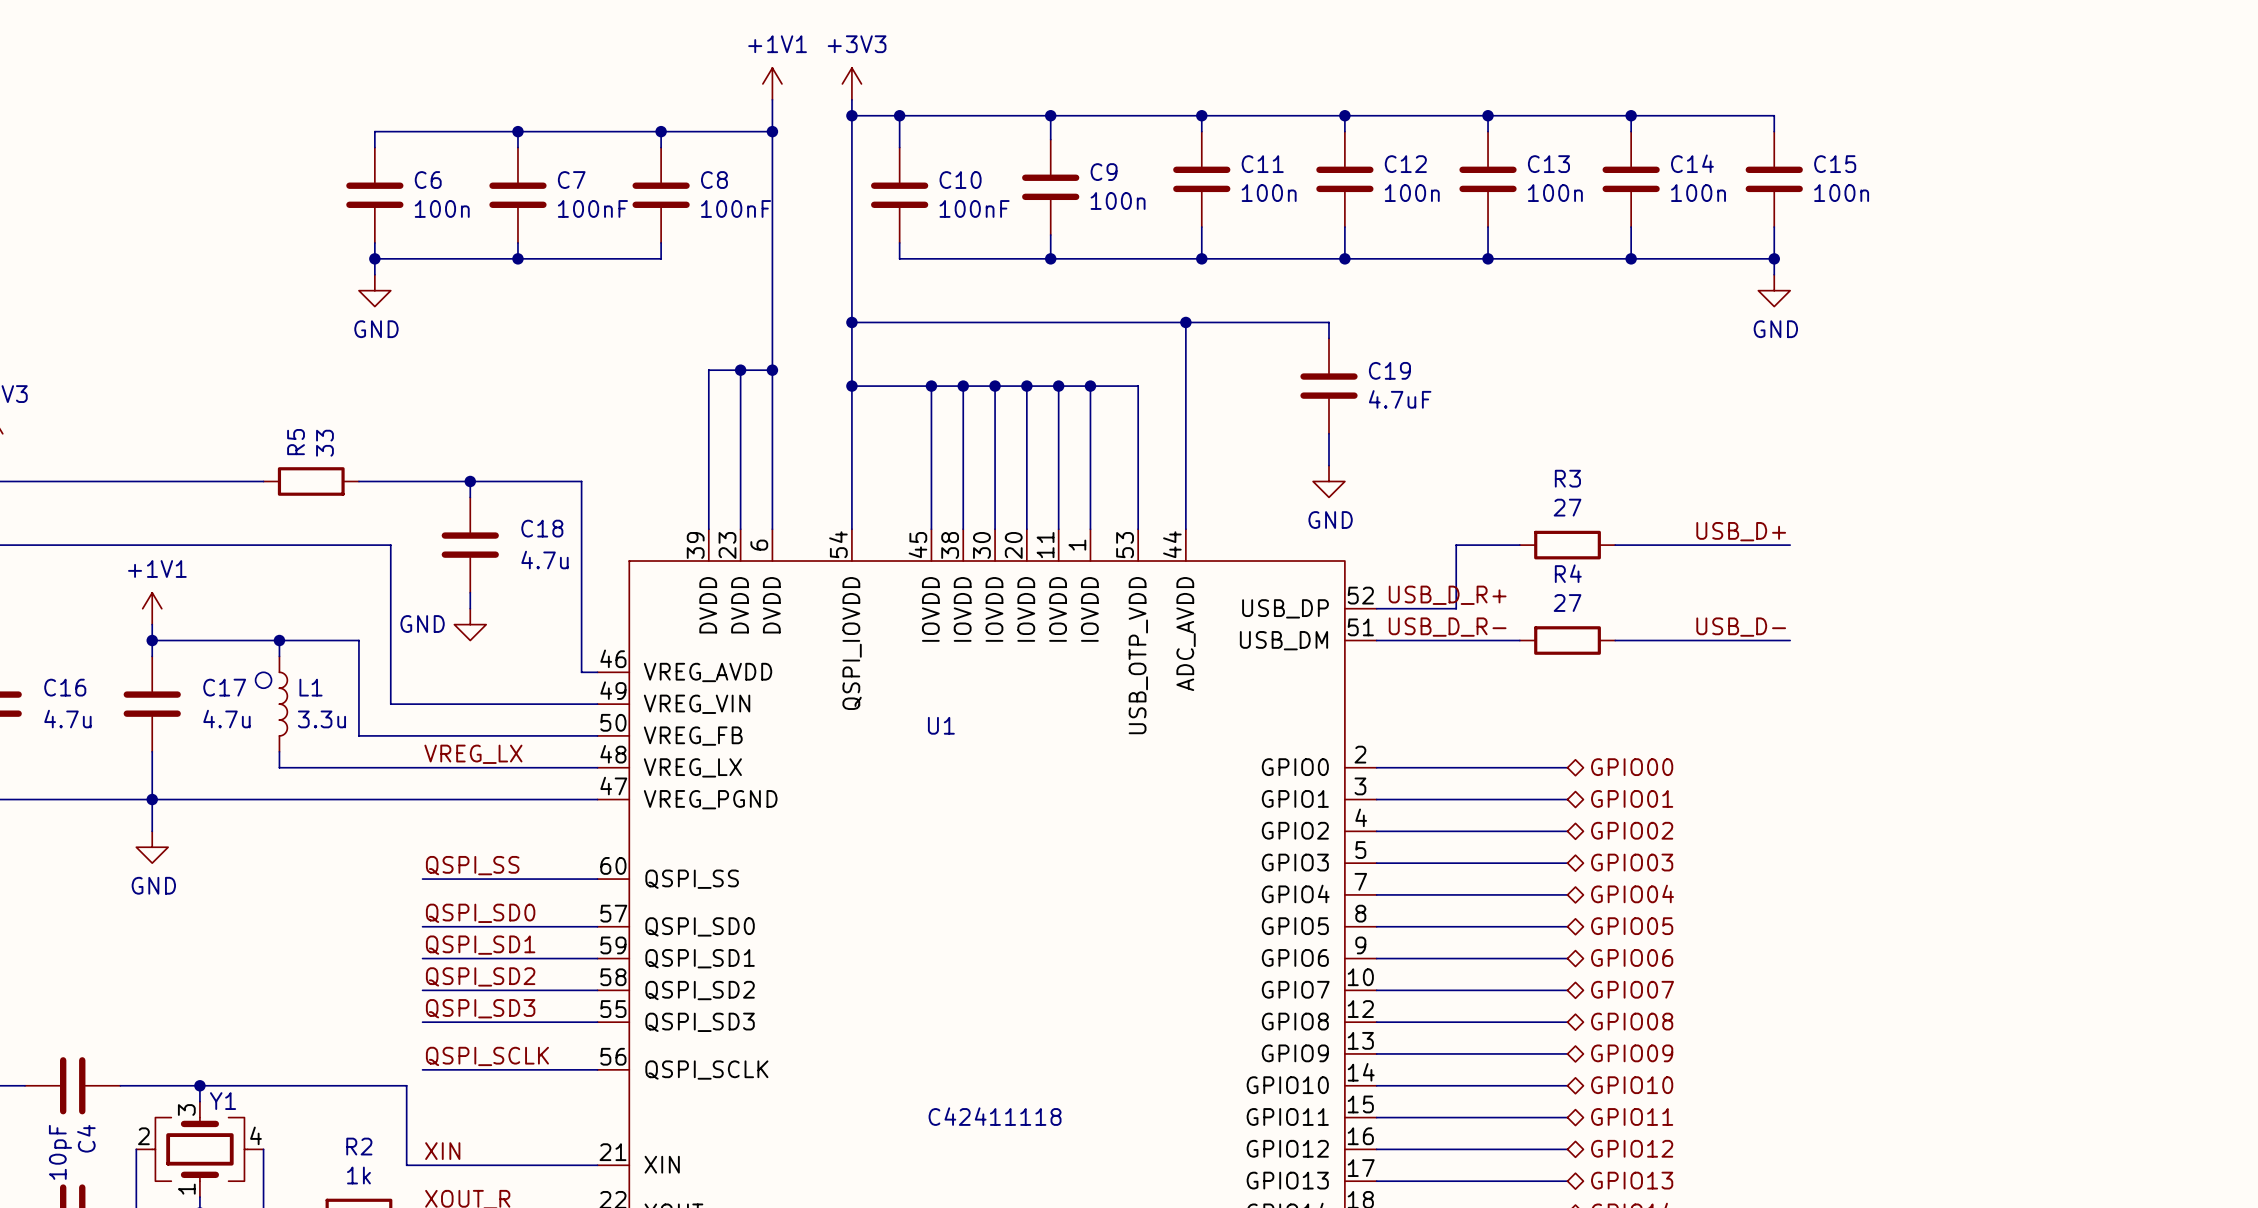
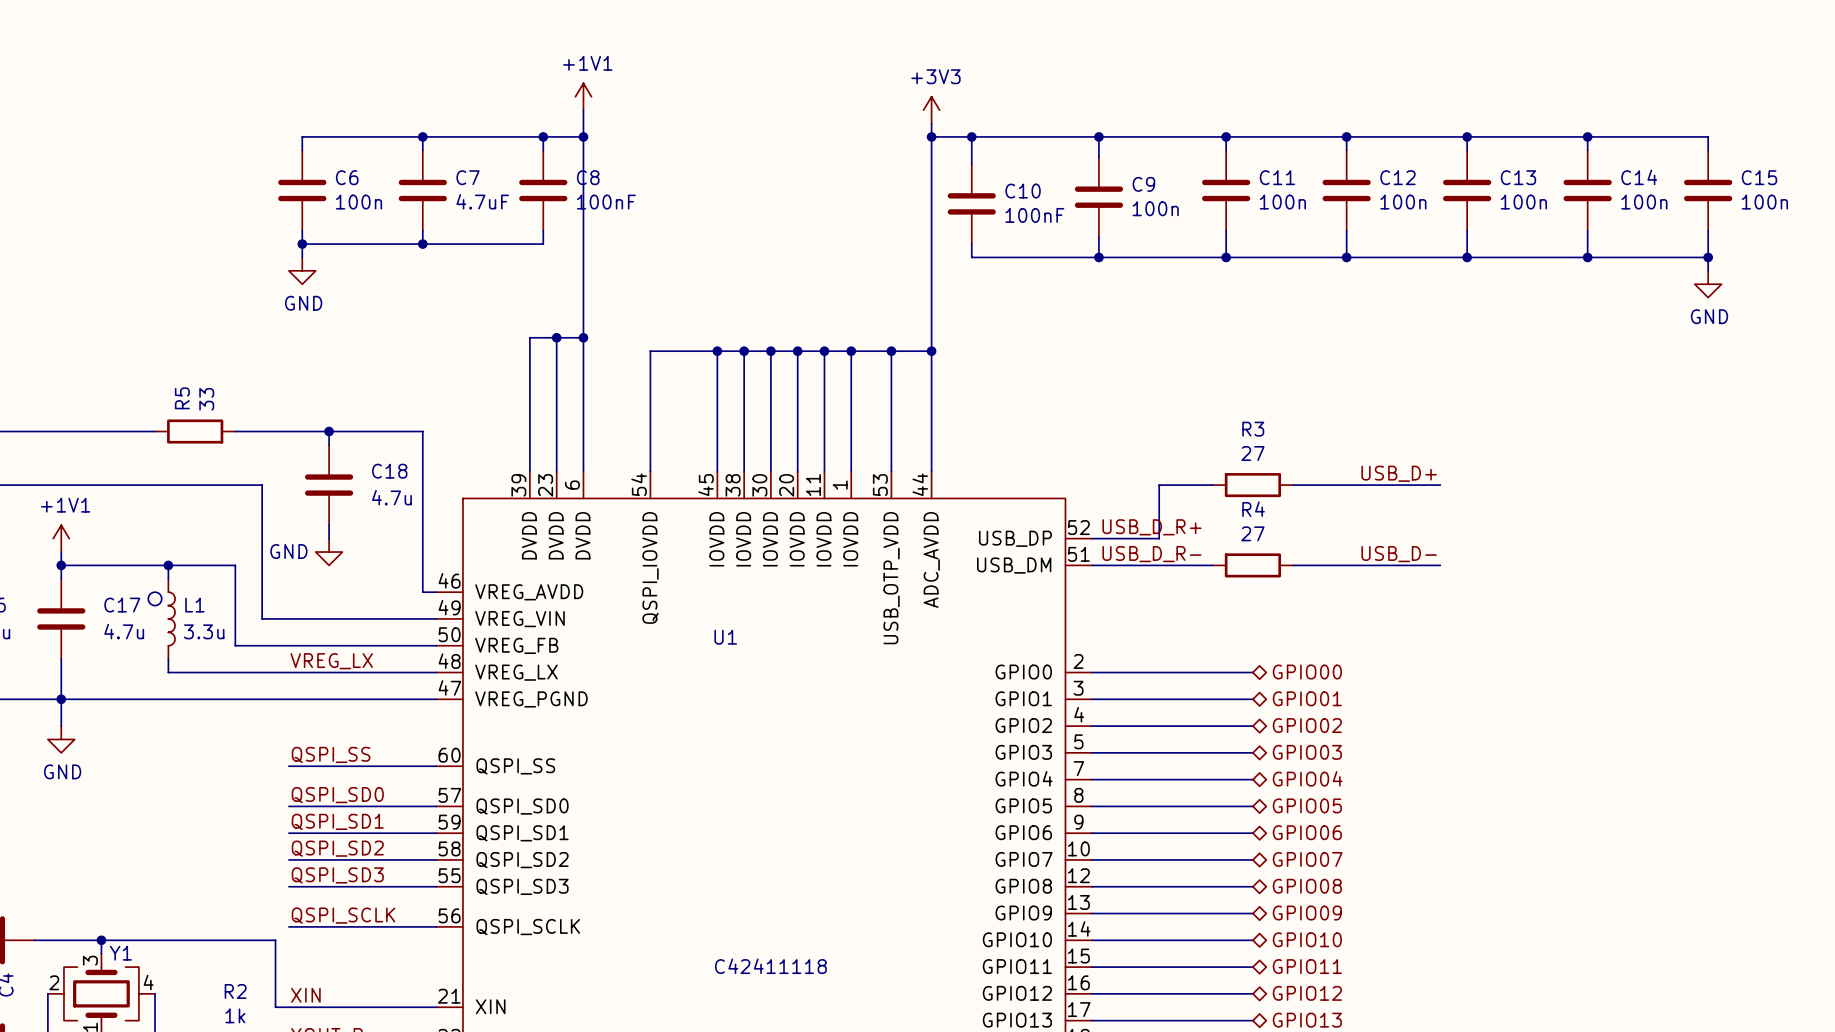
power symbol: +3V3 (851, 83) -> none
wire: (851, 99) (851, 386) -> none
power symbol: none -> +3V3 (931, 110)
wire: (851, 115) (1774, 115) (1774, 131) -> none
junction: (851, 115) -> none
wire: (899, 115) (899, 147) -> none
junction: (899, 115) -> none
wire: (1050, 115) (1050, 139) -> none
junction: (1050, 115) -> none
wire: none -> (931, 123) (931, 297)
wire: (1201, 115) (1201, 131) -> none
junction: (1201, 115) -> none
wire: (1344, 115) (1344, 131) -> (1226, 136) (1226, 150)
junction position: (1344, 115) -> (1098, 136)
wire: (1488, 115) (1488, 131) -> (1346, 136) (1346, 150)
junction: (1488, 115) -> none
wire: (1631, 115) (1631, 131) -> (1467, 136) (1467, 150)
junction: (1631, 115) -> none
wire: (438, 131) (374, 131) (374, 147) -> (302, 136) (302, 150)
wire: (517, 131) (517, 147) -> (422, 136) (422, 150)
junction: (517, 131) -> none
junction: none -> (422, 136)
wire: (661, 131) (661, 147) -> (543, 136) (543, 150)
junction: (661, 131) -> none
junction: none -> (543, 136)
wire: none -> (931, 136) (1708, 136) (1708, 150)
junction: none -> (931, 136)
junction: none -> (971, 136)
wire: none -> (1098, 136) (1098, 157)
junction: none -> (1226, 136)
junction: none -> (1346, 136)
junction: none -> (1467, 136)
wire: none -> (1587, 136) (1587, 150)
junction: none -> (1587, 136)
C11 position: (1201, 179) -> (1226, 190)
C12 position: (1344, 179) -> (1346, 190)
C13 position: (1488, 179) -> (1467, 190)
C14 position: (1631, 179) -> (1587, 190)
C15 position: (1774, 179) -> (1708, 190)
C9 position: (1050, 187) -> (1098, 197)
C6 position: (374, 195) -> (302, 190)
C7 position: (517, 195) -> (422, 190)
C8 position: (661, 195) -> (543, 190)
C10 position: (899, 195) -> (971, 203)
C7 value: 100nF (592, 208) -> 4.7uF (482, 201)
wire: (1201, 227) (1201, 258) -> (971, 136) (971, 163)
wire: (1344, 227) (1344, 258) -> (1226, 230) (1226, 257)
wire: (1488, 227) (1488, 258) -> (1346, 230) (1346, 257)
wire: (1631, 227) (1631, 258) -> (1467, 230) (1467, 257)
wire: (1774, 227) (1774, 274) -> none
wire: (1050, 235) (1050, 258) -> none
wire: (374, 242) (374, 274) -> (302, 230) (302, 257)
wire: (517, 242) (517, 258) -> (422, 230) (422, 244)
wire: (661, 242) (661, 258) -> (543, 230) (543, 244) (489, 244)
wire: (899, 242) (899, 258) (1774, 258) -> none
wire: none -> (1587, 230) (1587, 257)
wire: none -> (1708, 230) (1708, 270)
wire: none -> (1098, 237) (1098, 257)
wire: (374, 258) (438, 258) -> none
junction: (374, 258) -> none
junction: none -> (302, 244)
junction: (517, 258) -> none
junction: none -> (422, 244)
junction: (1050, 258) -> none
junction: (1201, 258) -> none
wire: none -> (971, 244) (971, 257) (1708, 257)
junction position: (1344, 258) -> (1098, 257)
junction: (1488, 258) -> none
junction: (1631, 258) -> none
junction: (1774, 258) -> none
junction: none -> (1226, 257)
junction: none -> (1346, 257)
junction: none -> (1467, 257)
junction: none -> (1587, 257)
junction: none -> (1708, 257)
power symbol position: GND (374, 290) -> GND (302, 270)
power symbol: GND (1774, 290) -> none
power symbol: none -> GND (1708, 284)
wire: (851, 322) (1328, 322) (1328, 338) -> none
junction: (851, 322) -> none
junction: (1185, 322) -> none
junction: (851, 386) -> none
wire: none -> (891, 351) (931, 351)
junction: none -> (891, 351)
junction: none -> (931, 351)
C19: 4.7uF (1328, 386) -> none
wire: (1328, 433) (1328, 465) -> none
power symbol: GND (1328, 481) -> none

